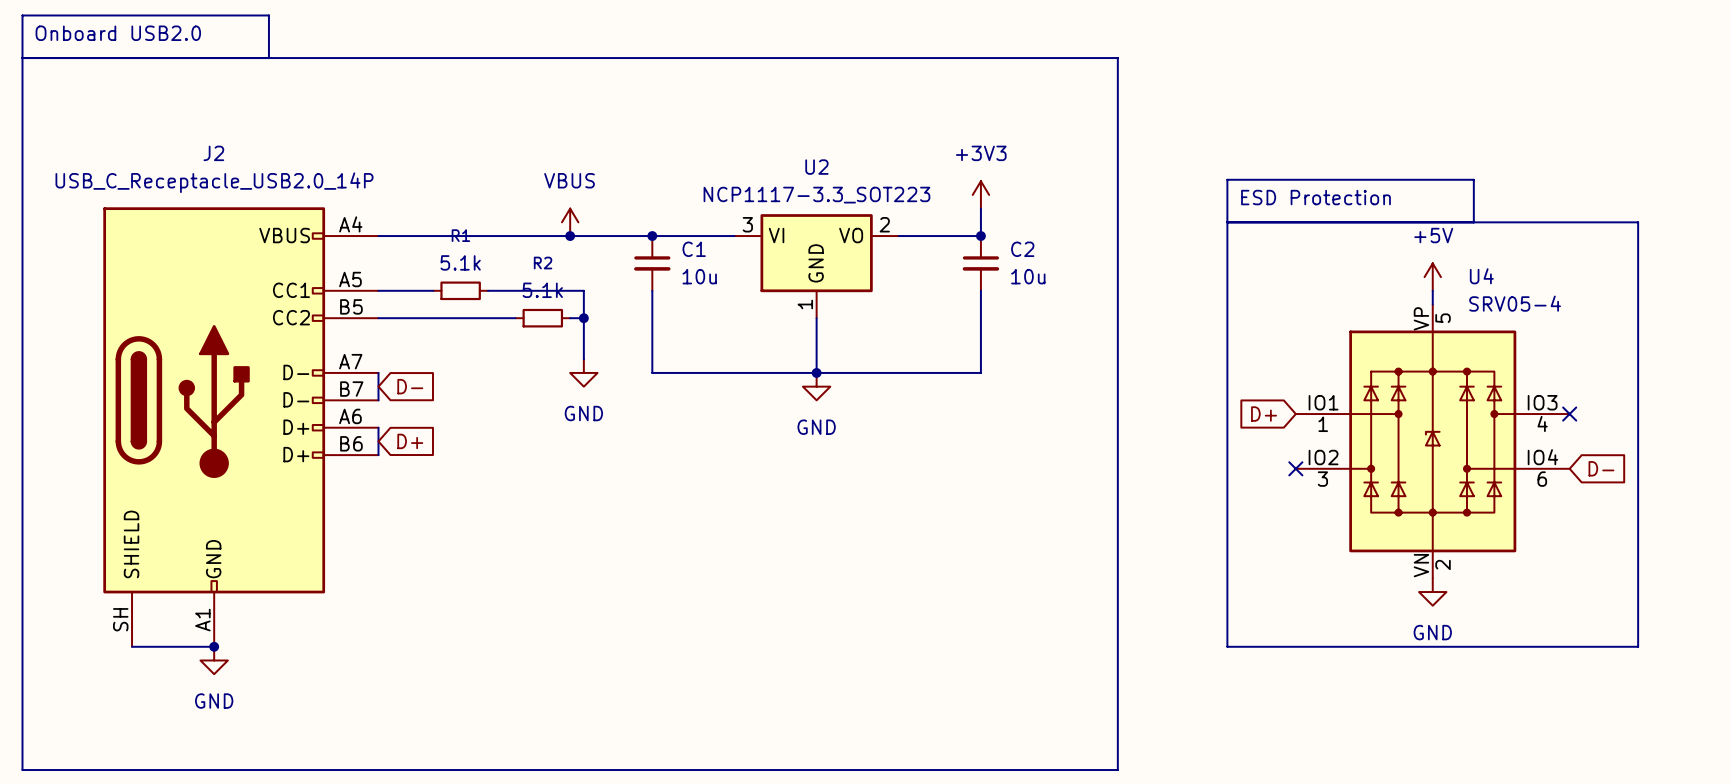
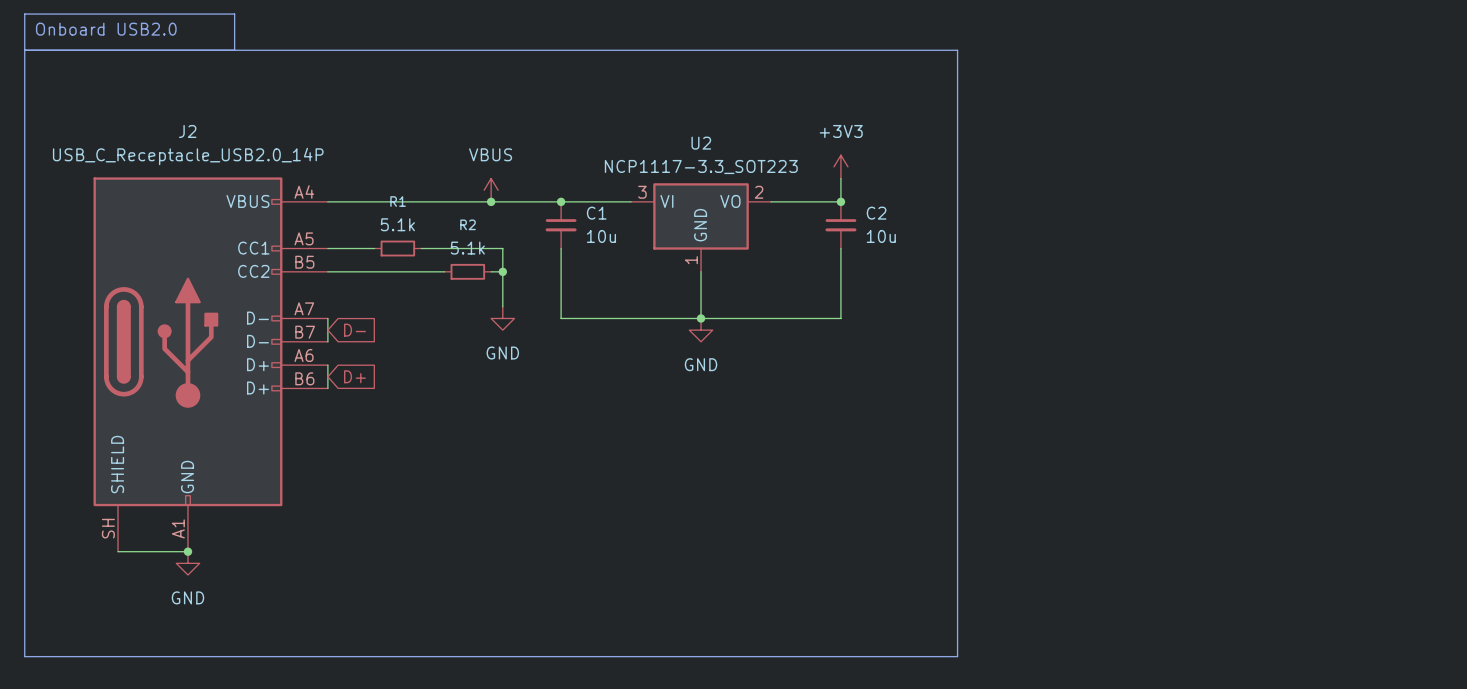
text: ESD Protection (1315, 197) -> none
line: (1227, 222) (1638, 222) (1638, 646) (1227, 646) (1227, 179) (1473, 179) (1473, 222) -> none
power symbol: +5V (1432, 277) -> none
wire: (1432, 290) (1432, 304) -> none
global label: D+ (1264, 414) -> none
no-connect mark: (1569, 414) -> none
U4: SRV05-4 (1432, 441) -> none
no-connect mark: (1295, 468) -> none
global label: D- (1601, 468) -> none
power symbol: GND (1432, 592) -> none

